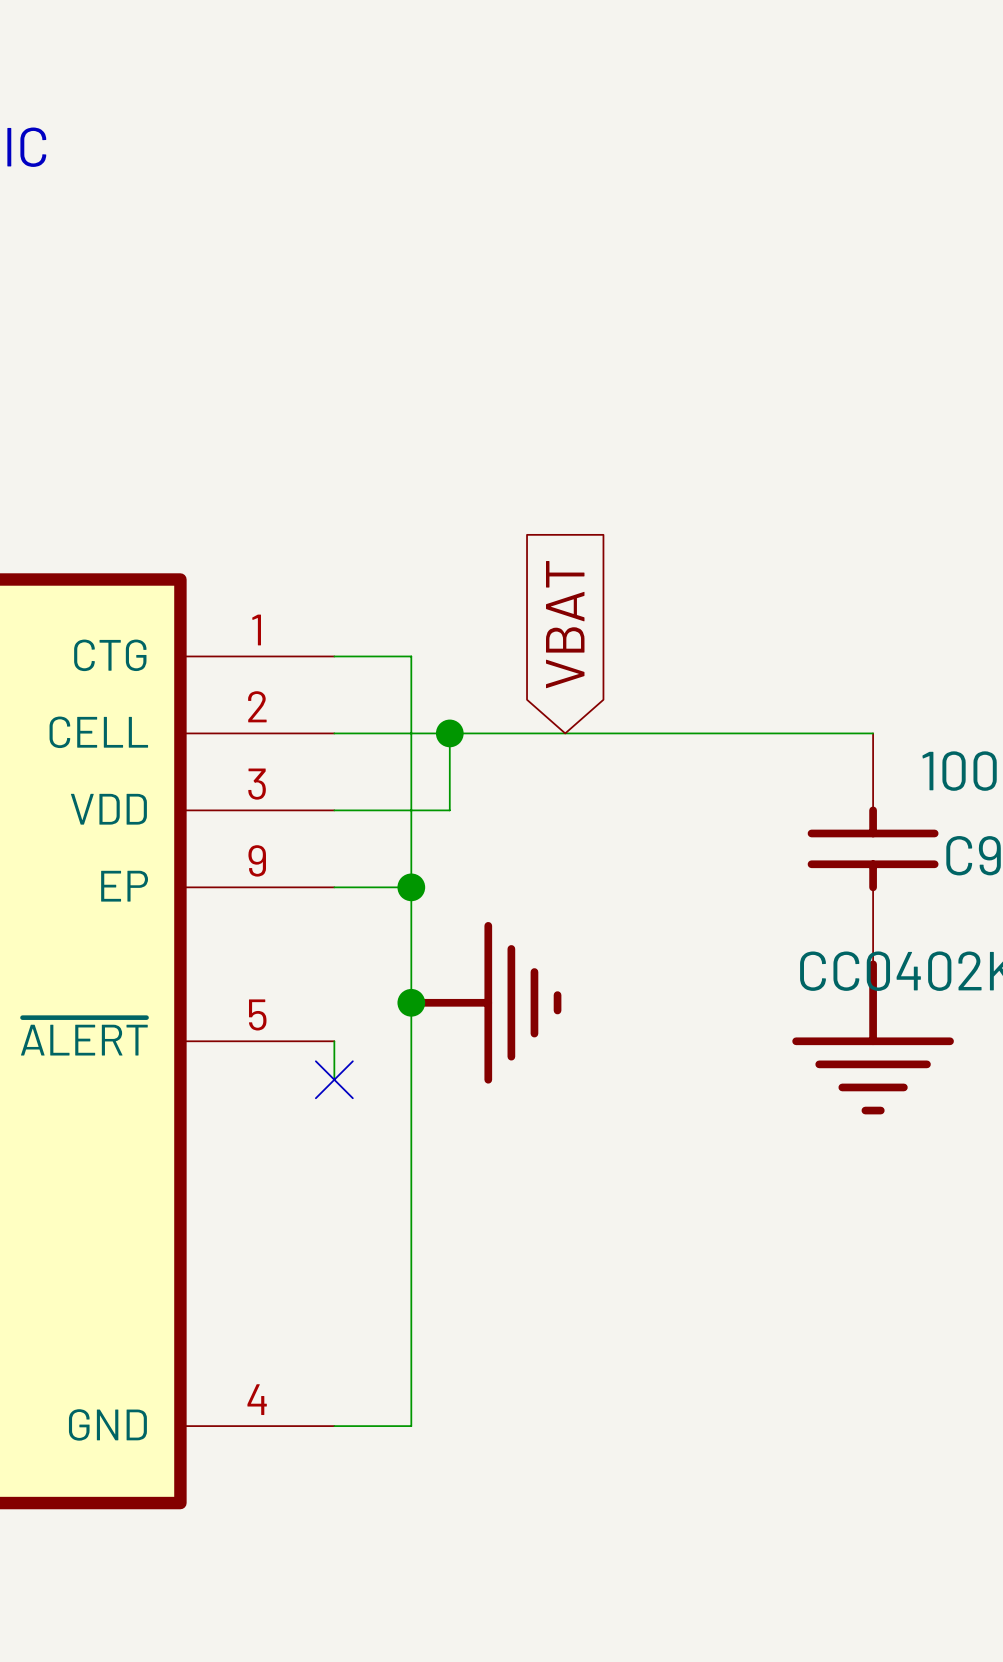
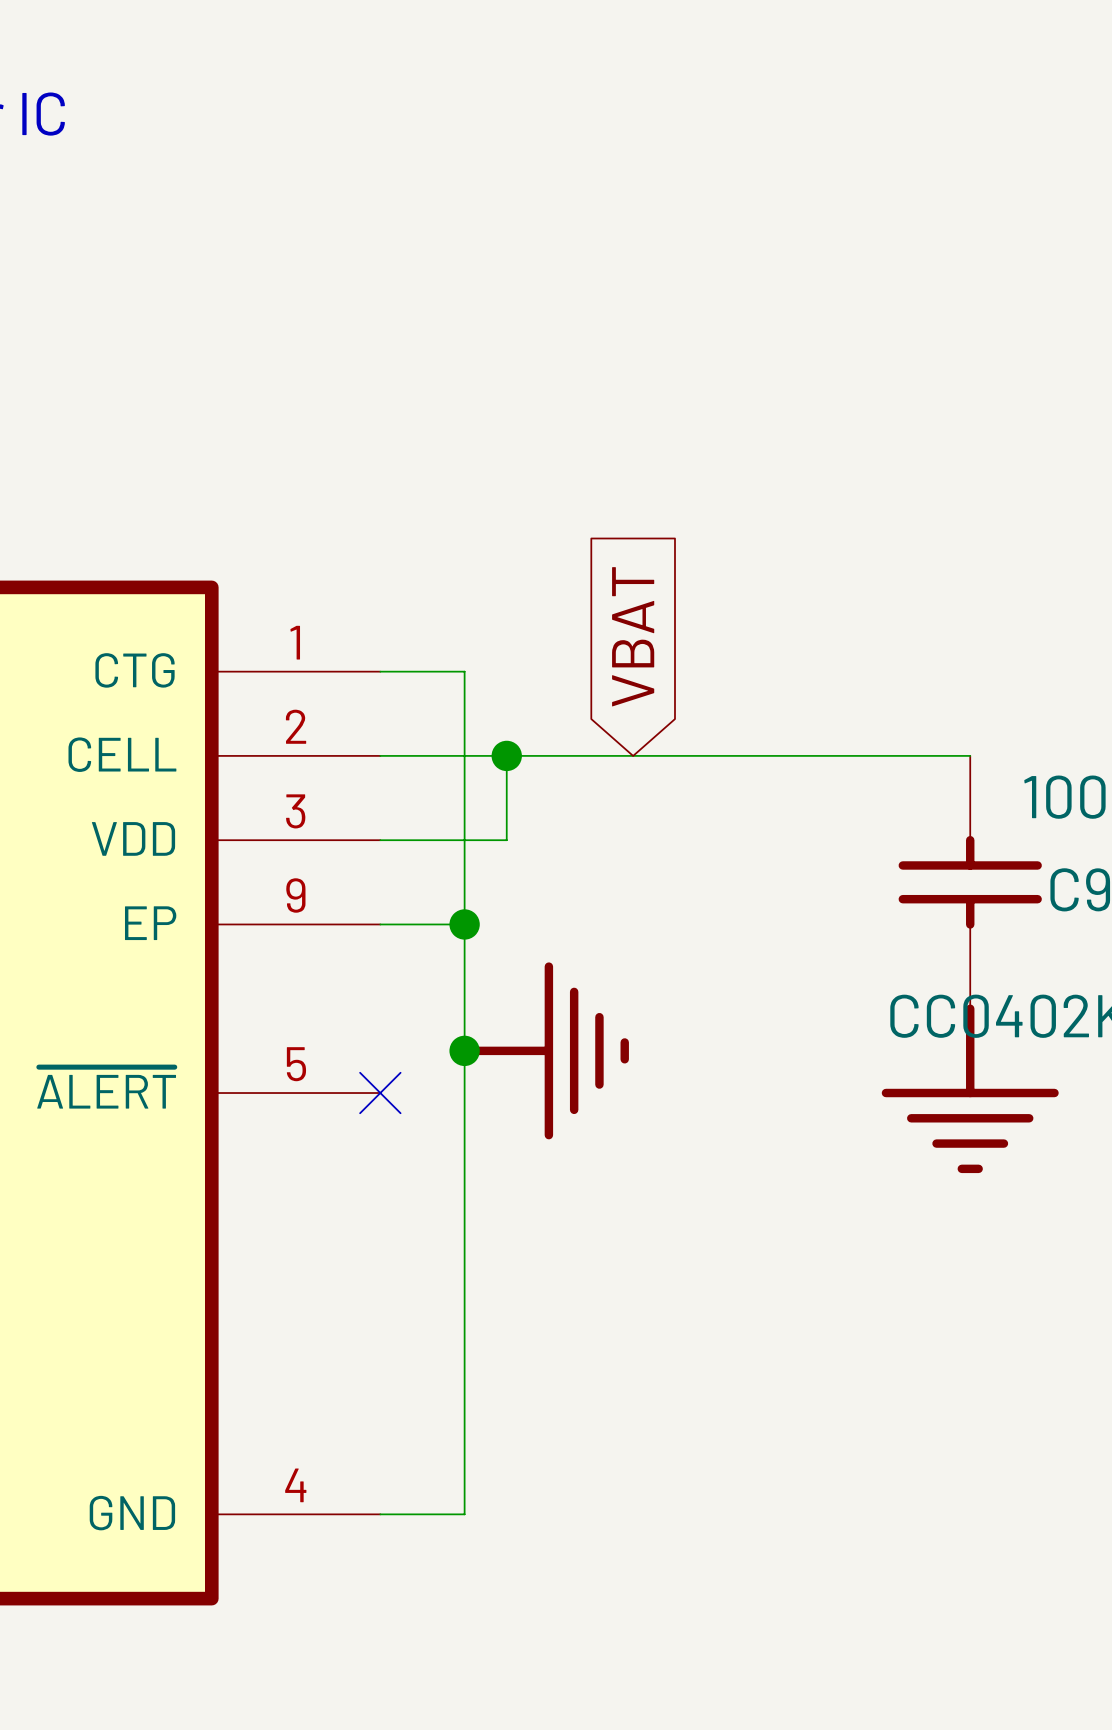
wire: (334, 1041) (334, 1079) -> none
no-connect mark position: (334, 1079) -> (380, 1093)

